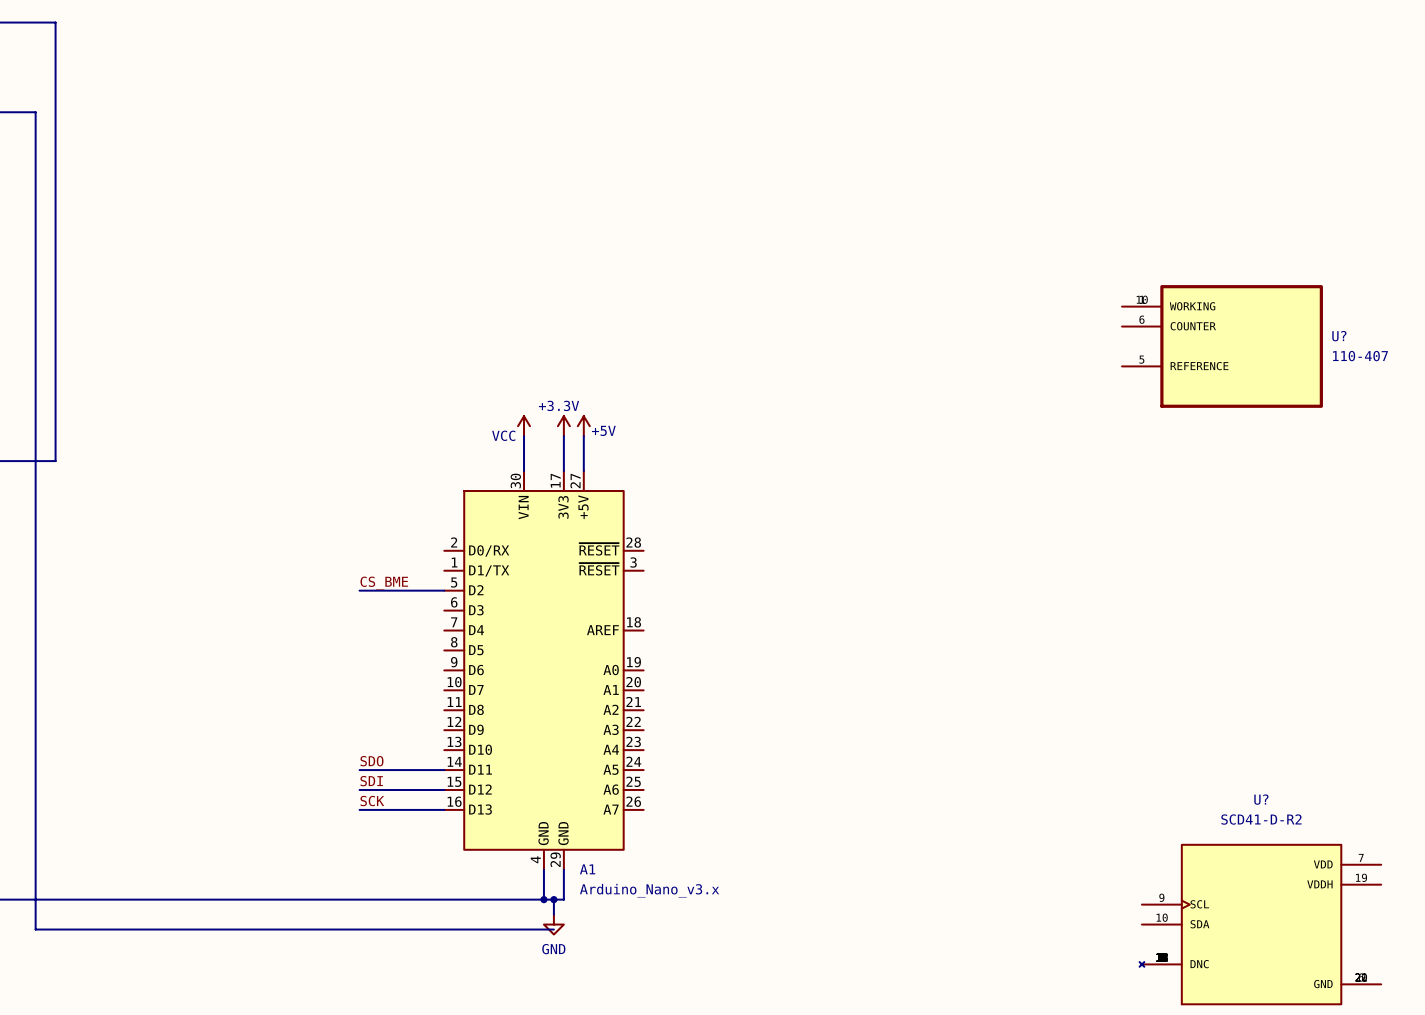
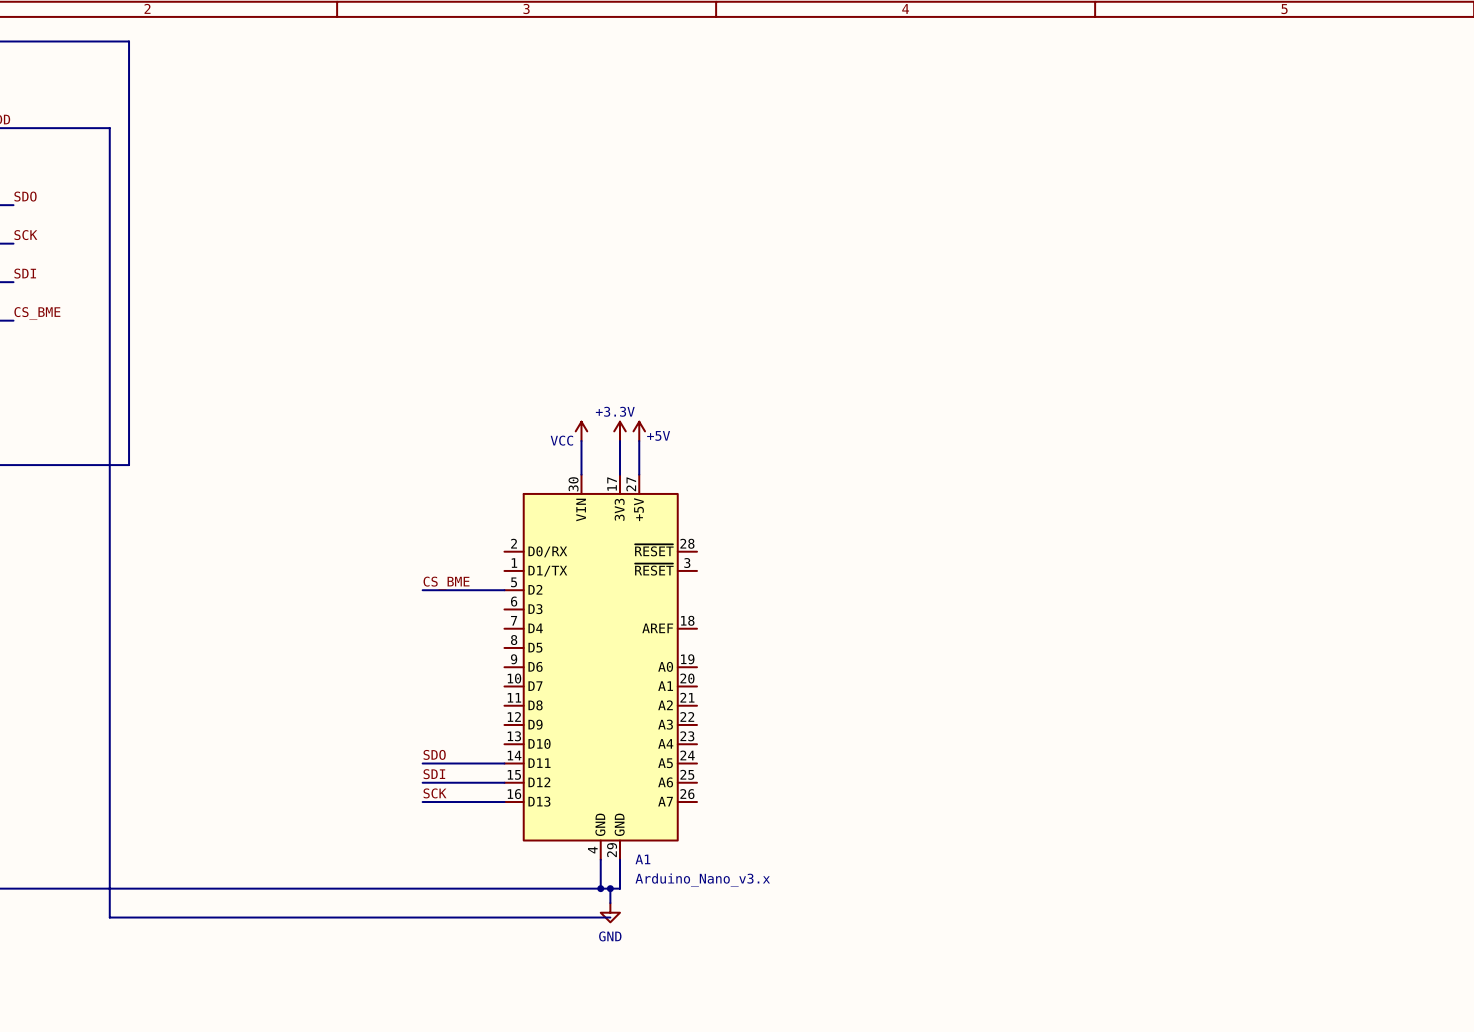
U?: 110-407 (1222, 346) -> none
U?: SCD41-D-R2 (1260, 924) -> none

